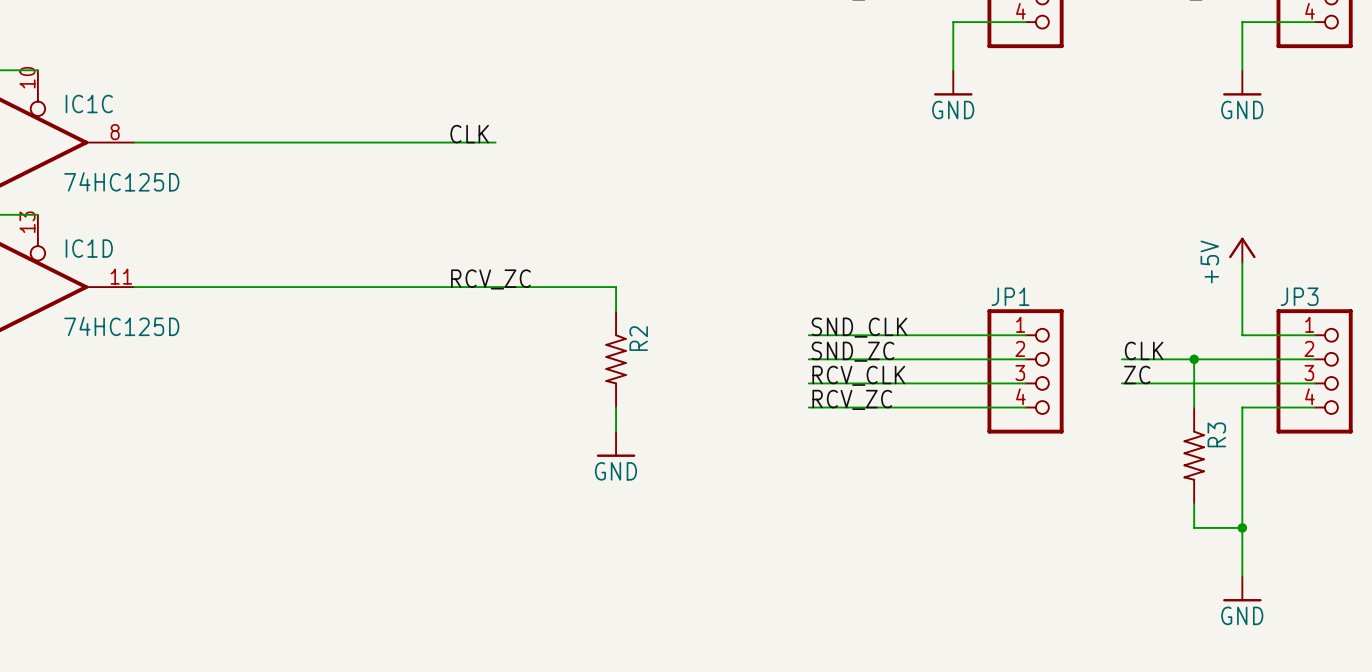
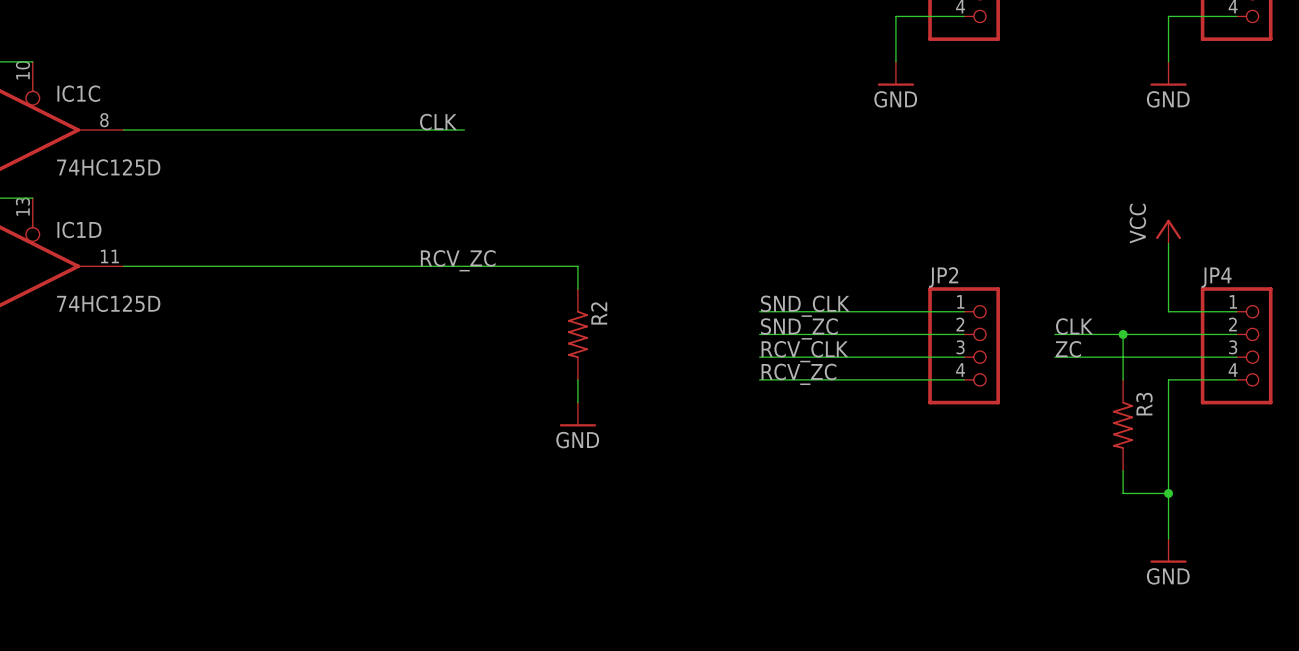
power symbol: +5V (1242, 250) -> VCC (1168, 231)
JP1 name: JP1 (1010, 296) -> JP2 (943, 277)
JP3 name: JP3 (1299, 296) -> JP4 (1216, 277)

